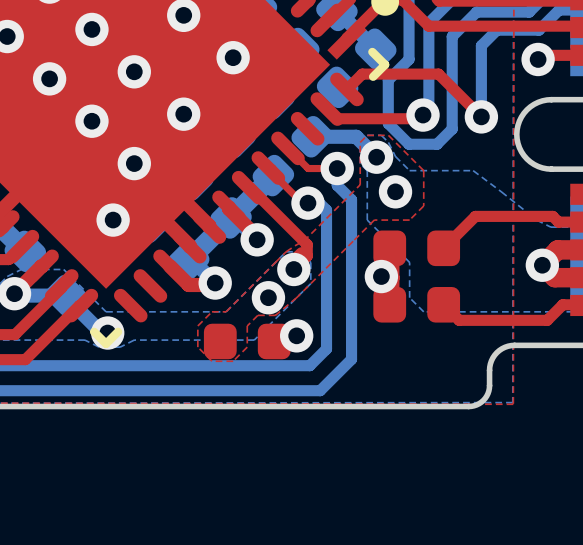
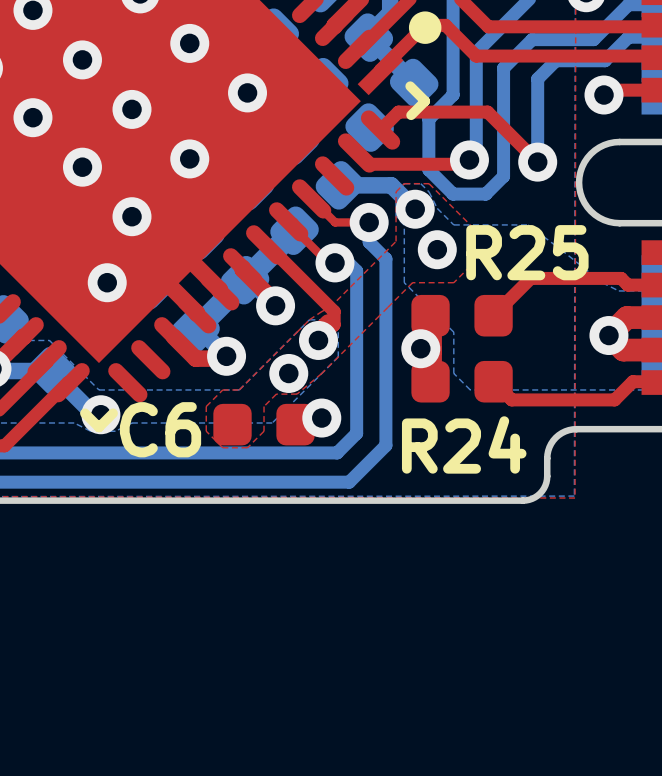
R25 name: none -> R25 (527, 252)
C6 name: none -> C6 (160, 429)
R24 name: none -> R24 (464, 444)

